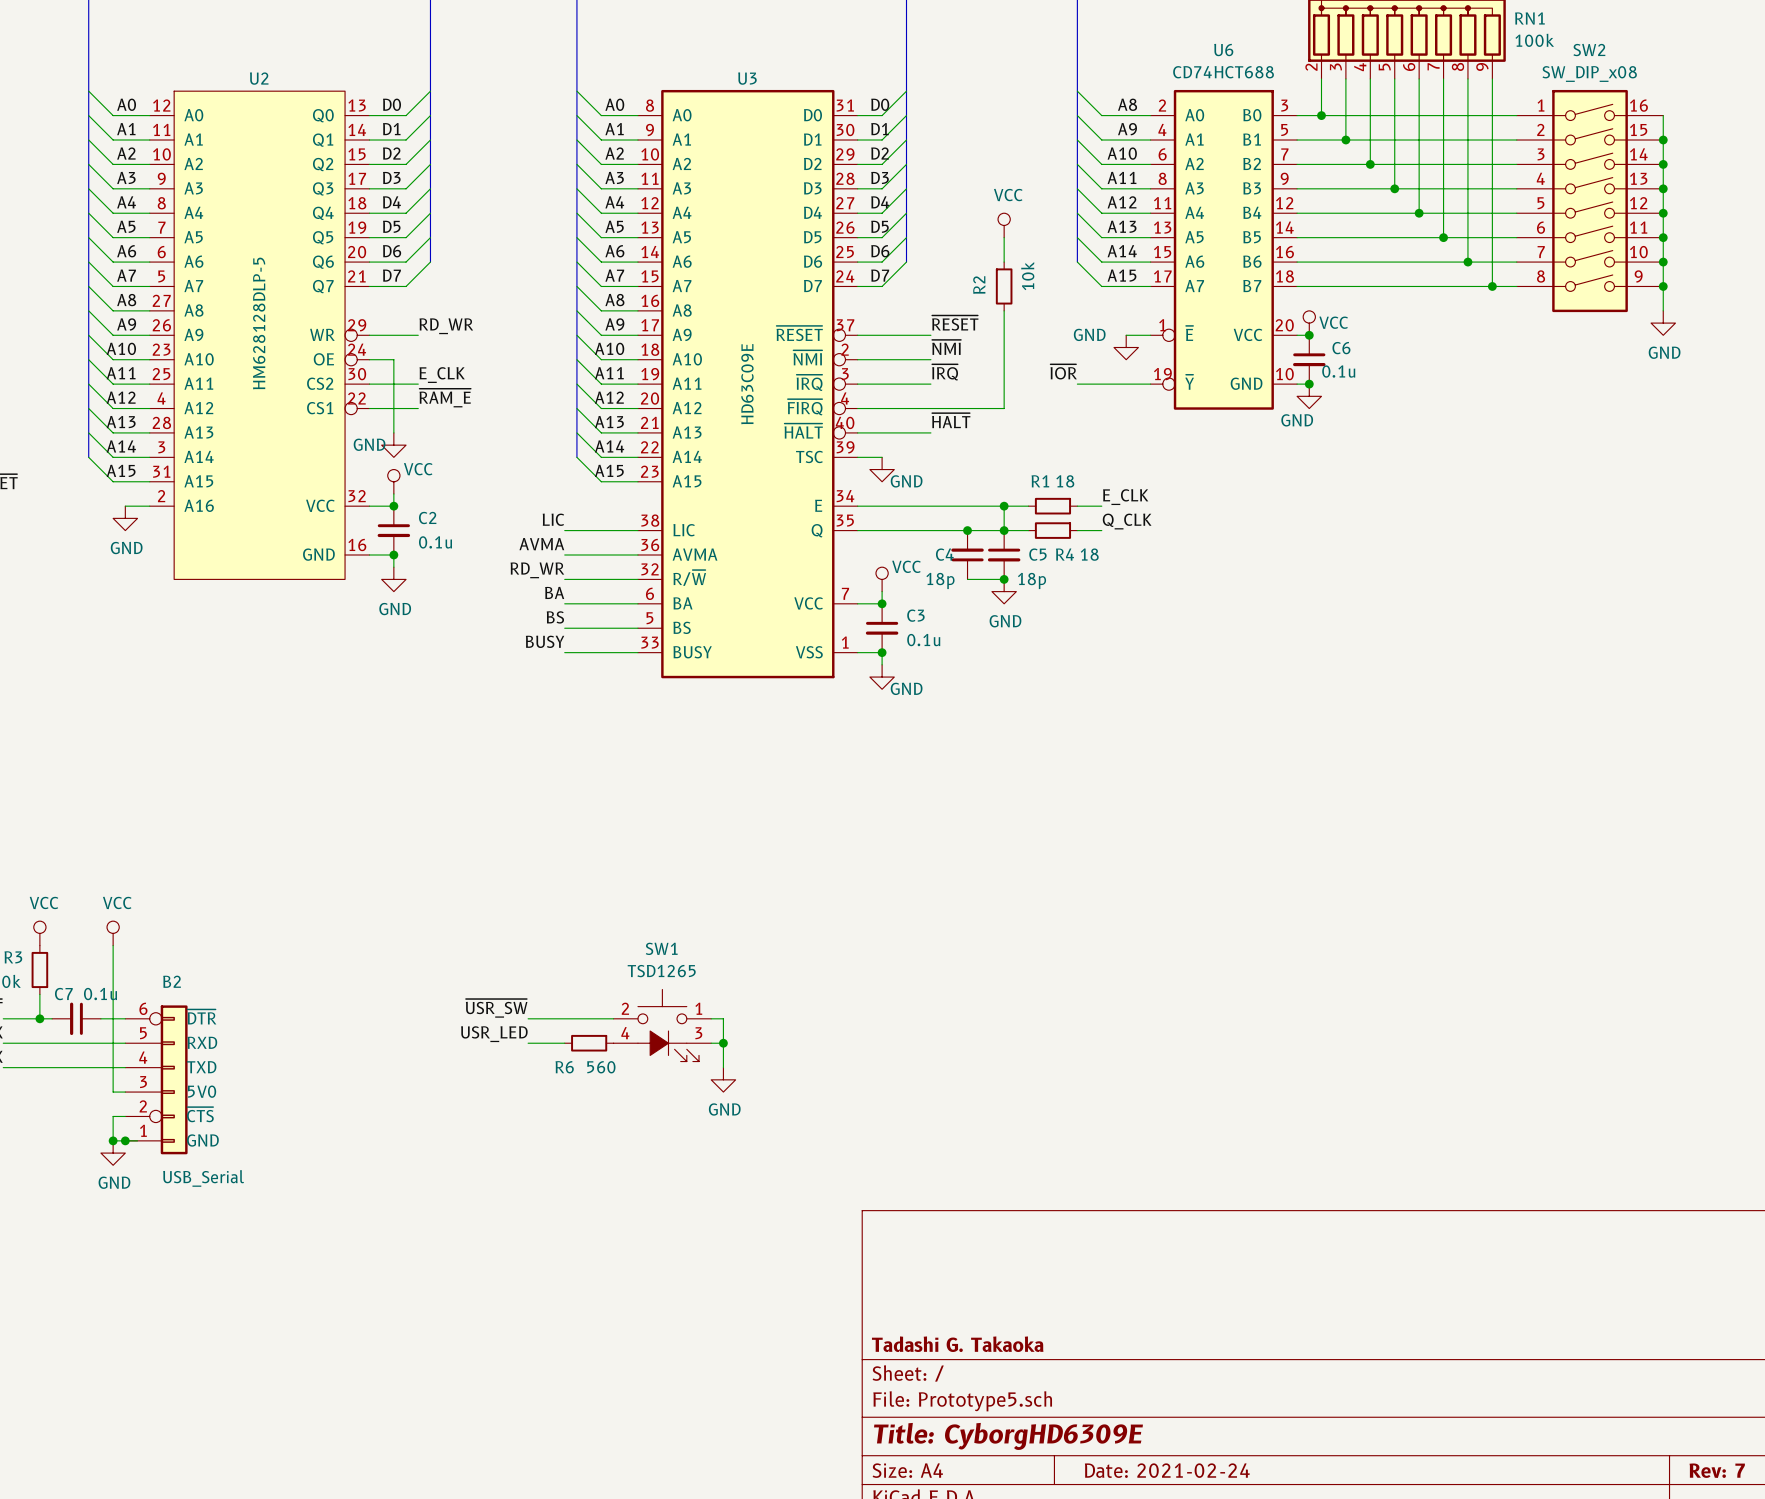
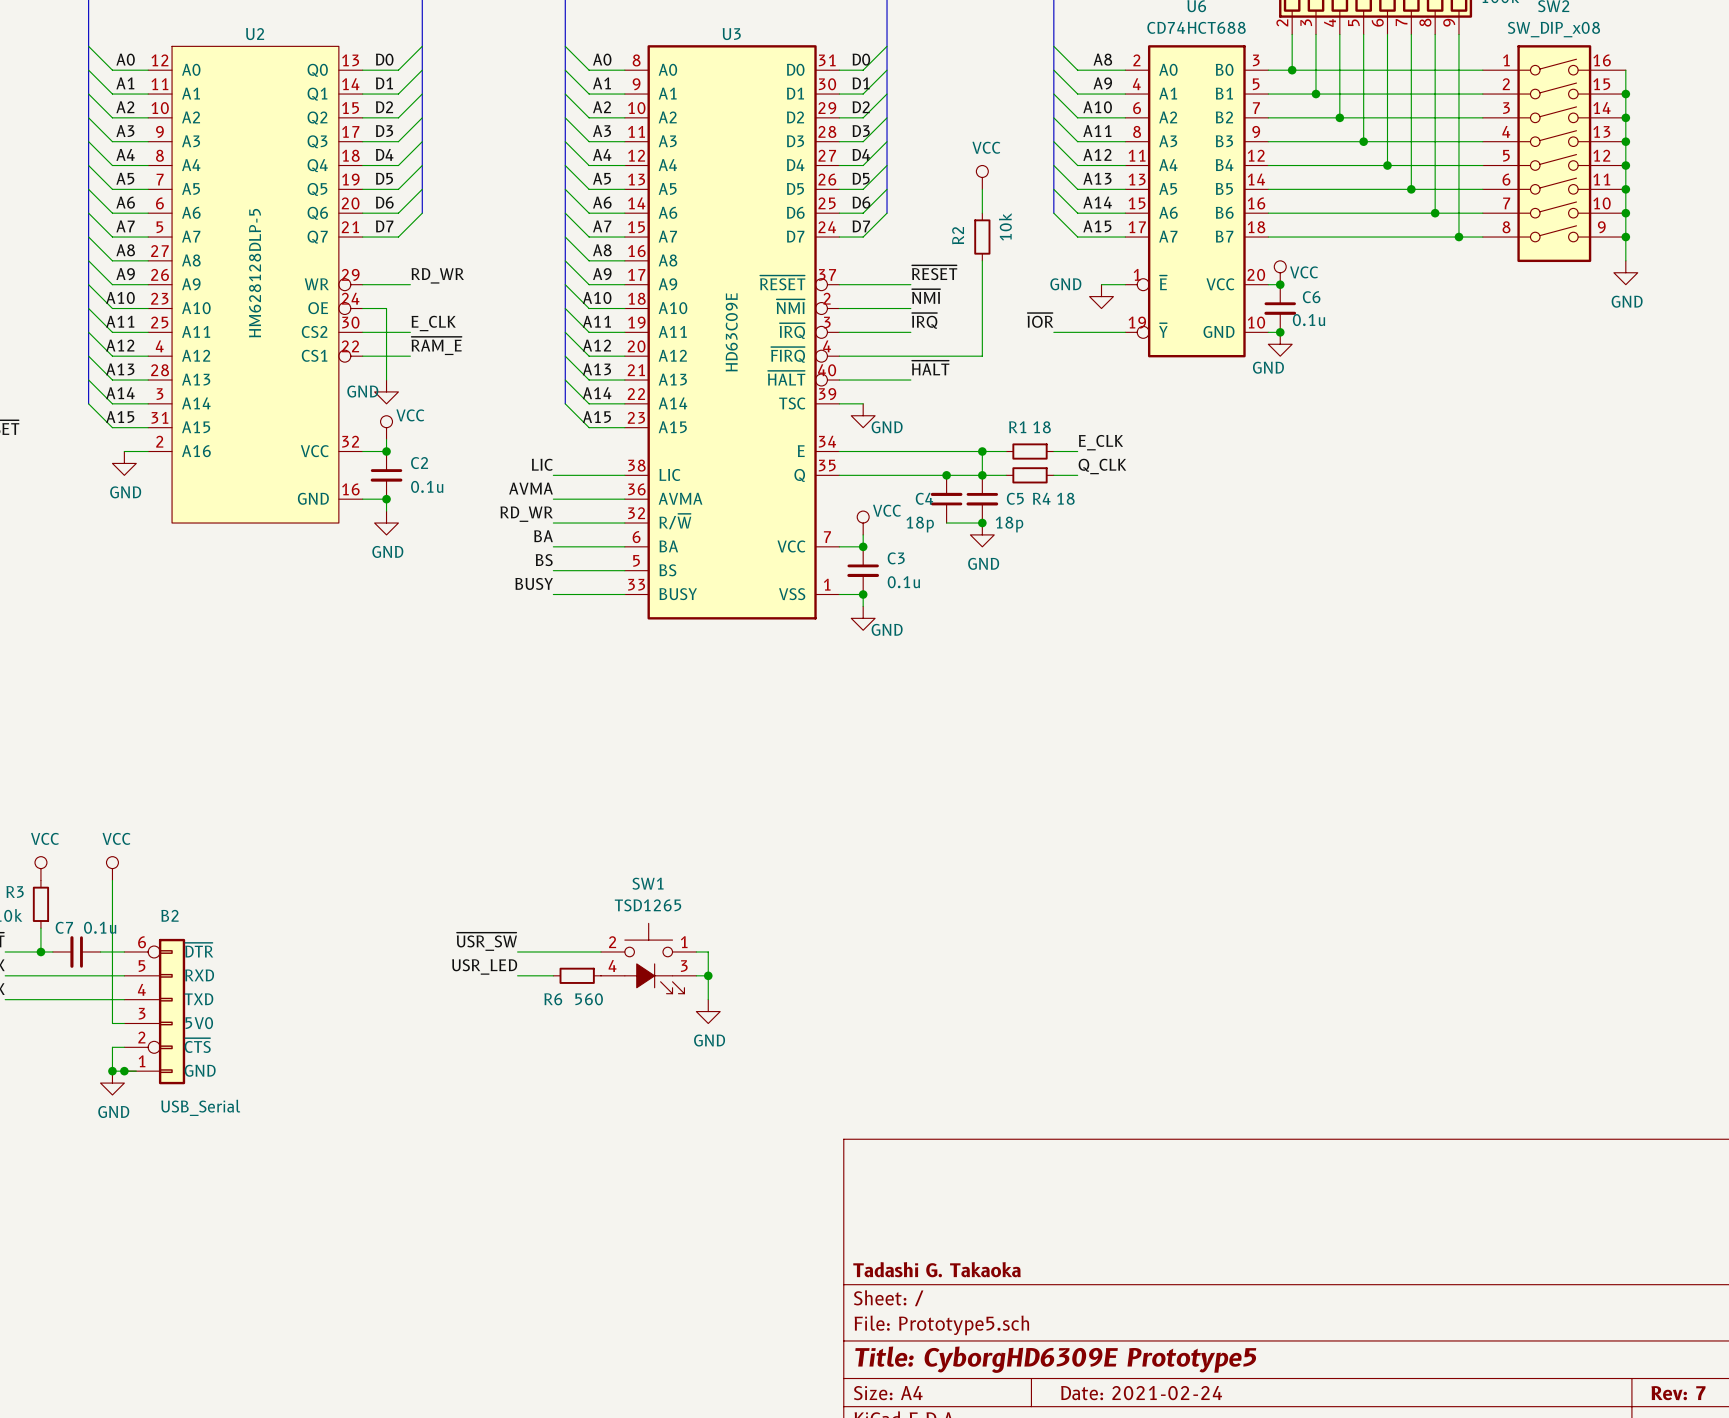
title block: Title: CyborgHD6309E (1008, 1436) -> Title: CyborgHD6309E Prototype5 (1055, 1359)

